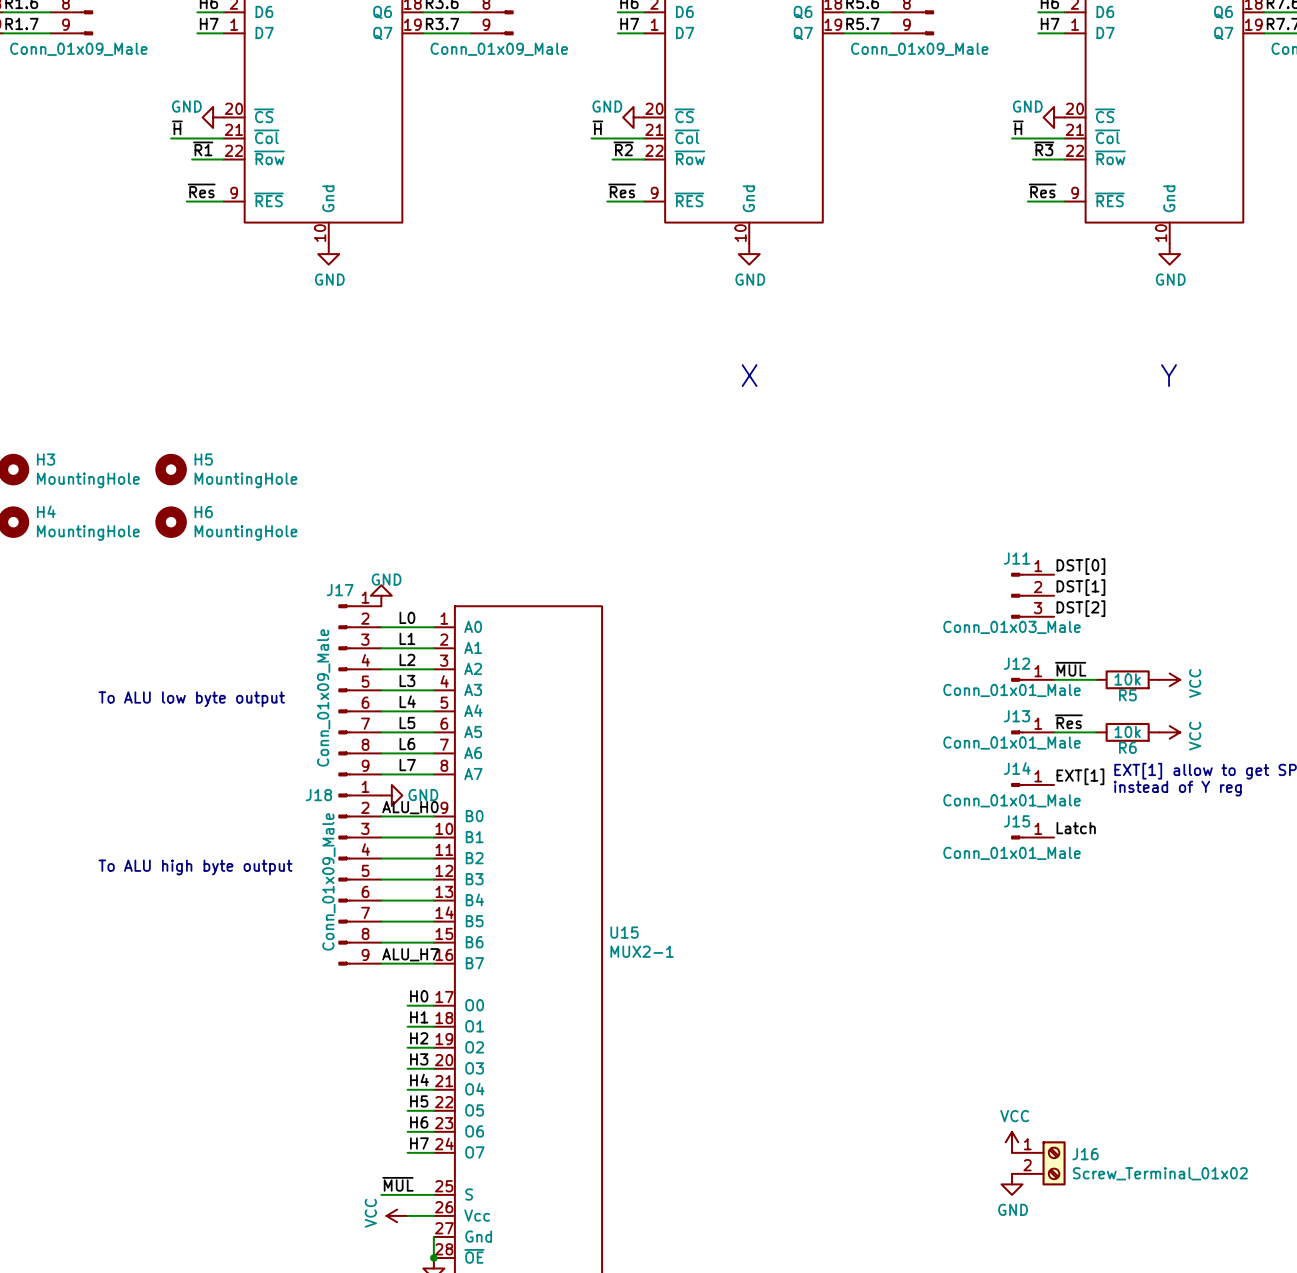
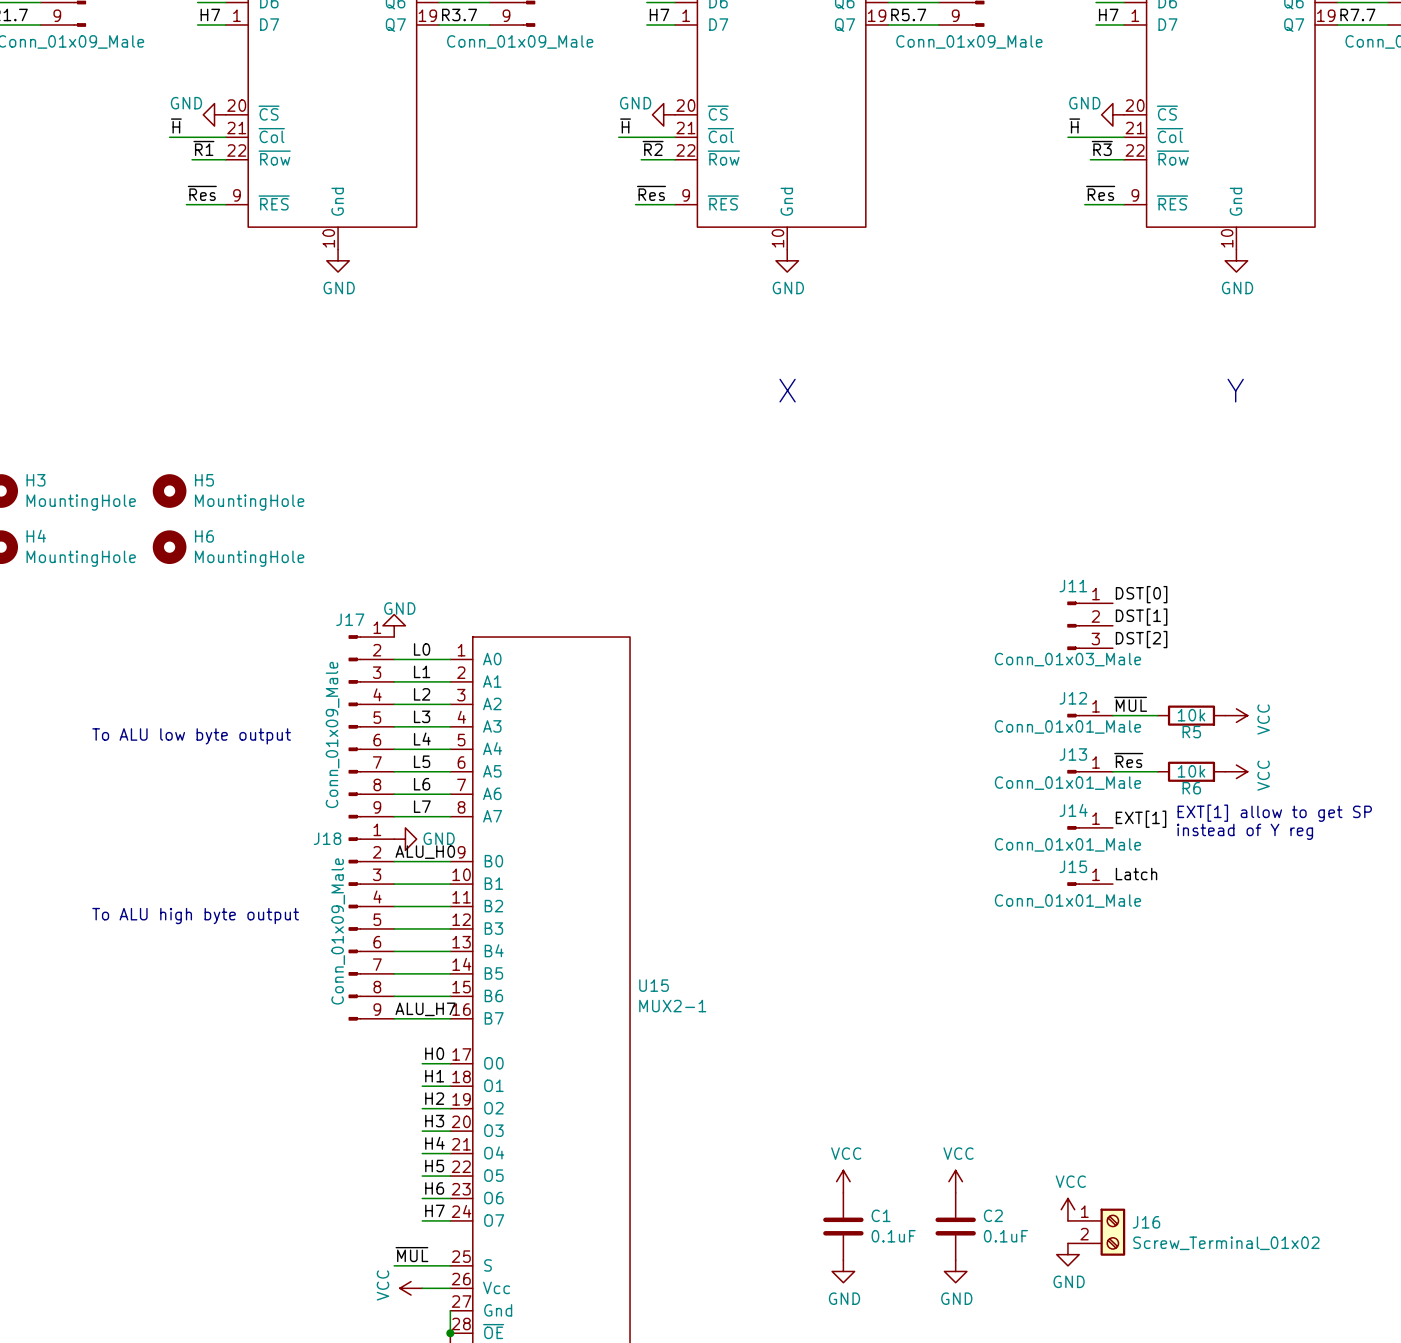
power symbol: none -> VCC (843, 1181)
power symbol: none -> VCC (955, 1181)
C1: none -> 0.1uF (843, 1226)
C2: none -> 0.1uF (955, 1226)
power symbol: none -> GND (843, 1271)
power symbol: none -> GND (955, 1271)

